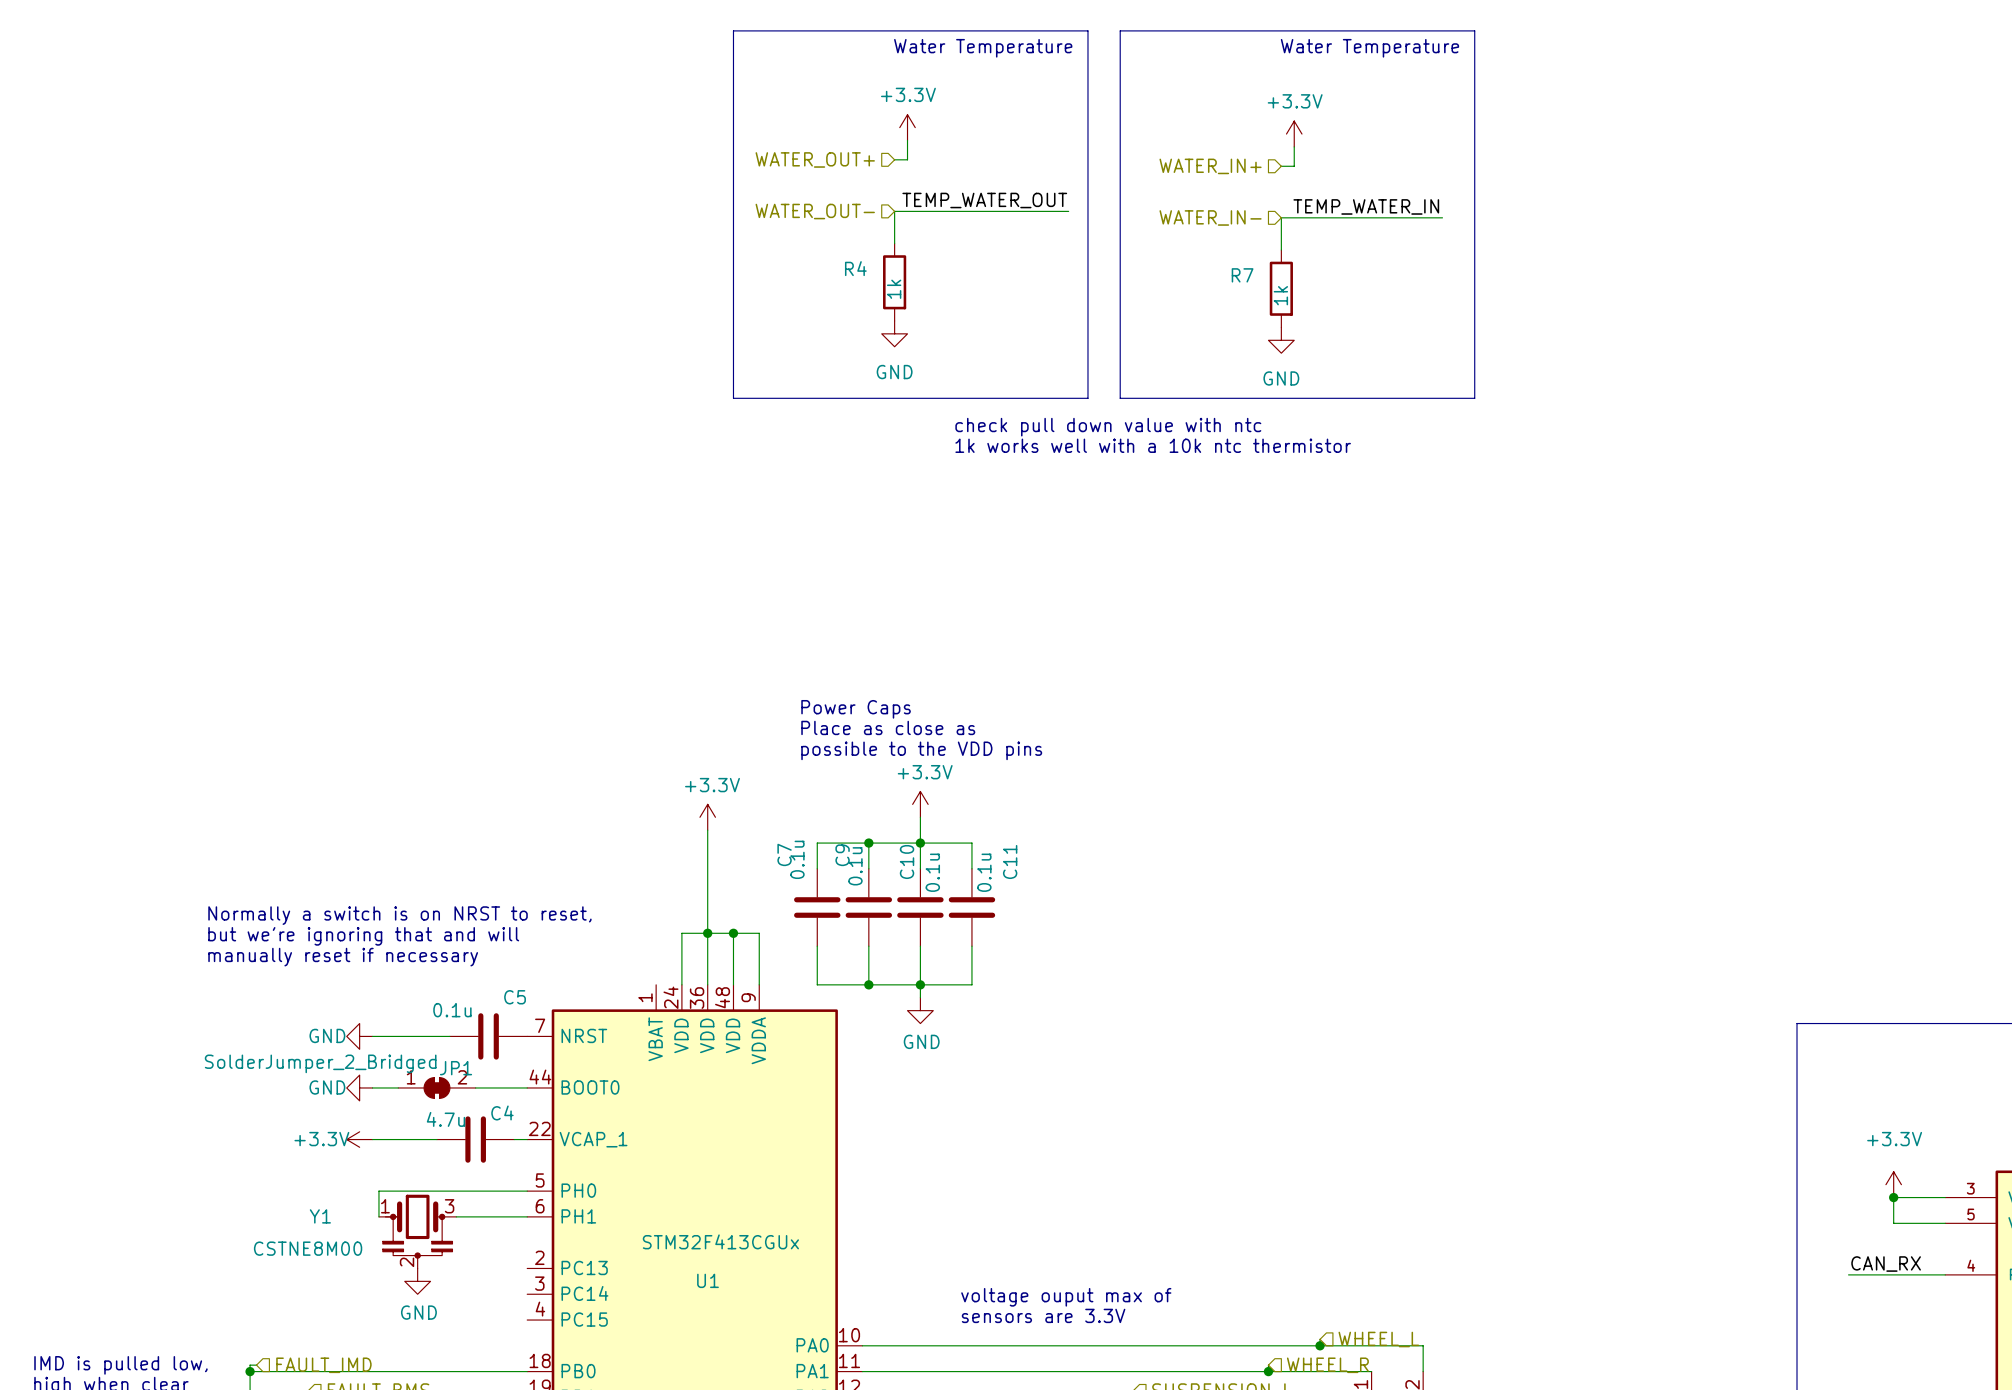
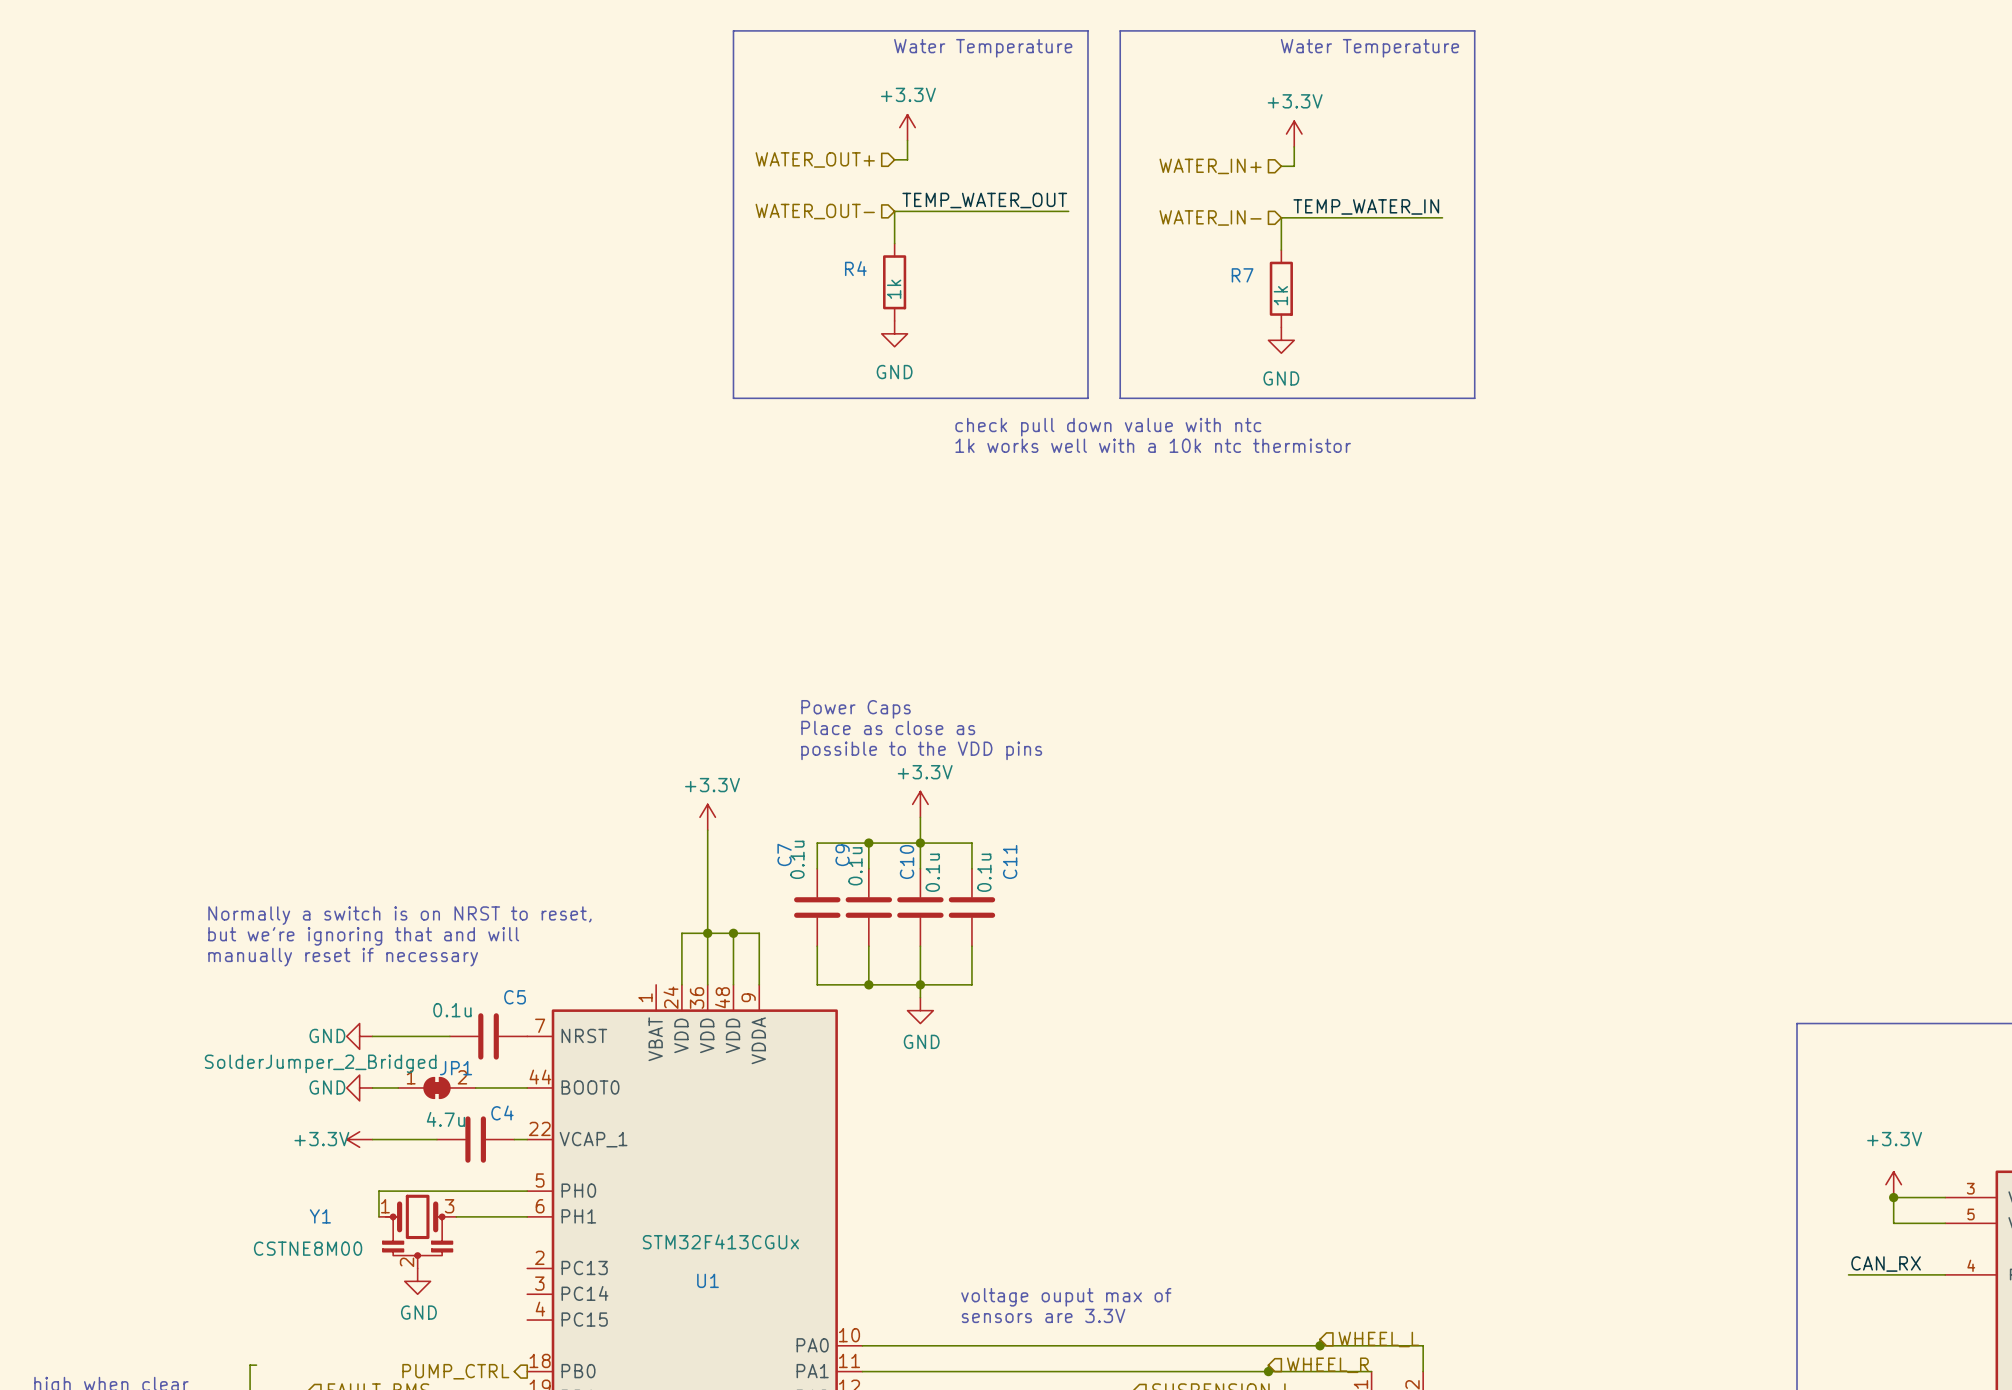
text: IMD is pulled low, (120, 1365) -> none
hierarchical label: FAULT_IMD (323, 1365) -> none
wire: (250, 1371) (527, 1371) -> none
junction: (250, 1371) -> none
hierarchical label: none -> PUMP_CTRL (455, 1371)

